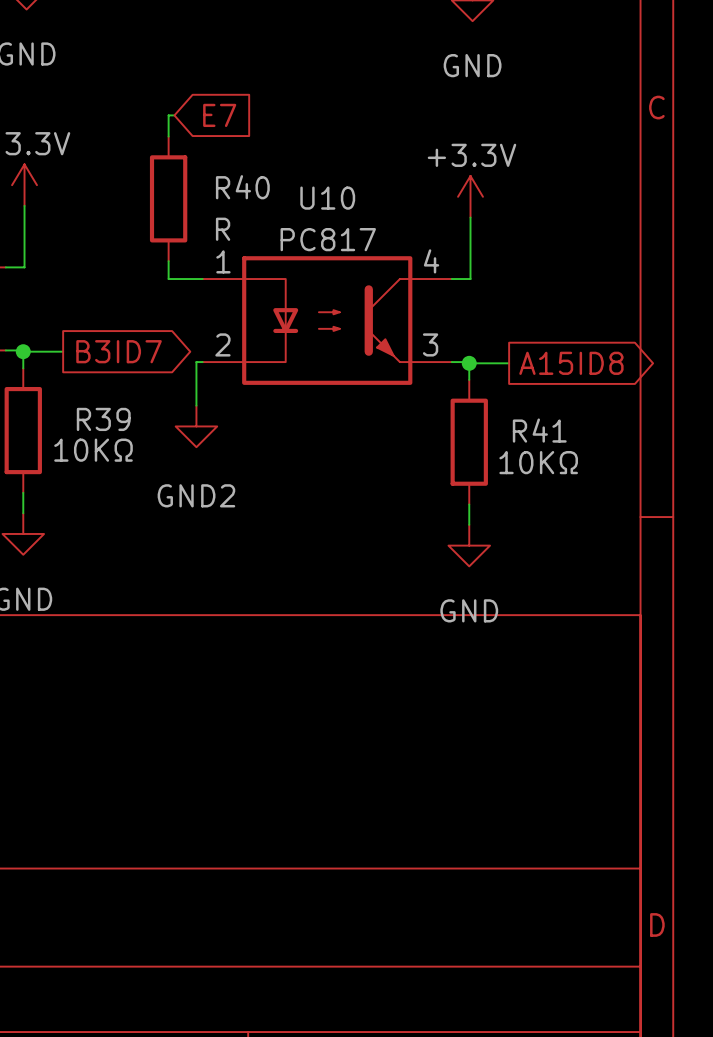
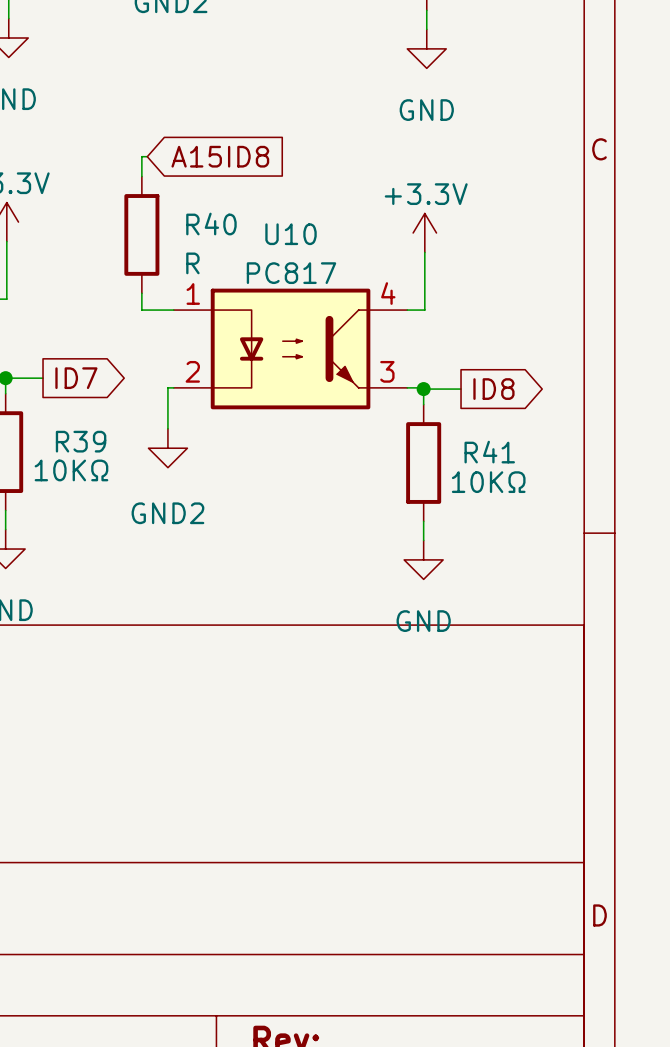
global label: E7 (219, 115) -> A15ID8 (220, 156)
global label: B3ID7 (119, 351) -> ID7 (76, 378)
global label: A15ID8 (571, 363) -> ID8 (493, 389)

